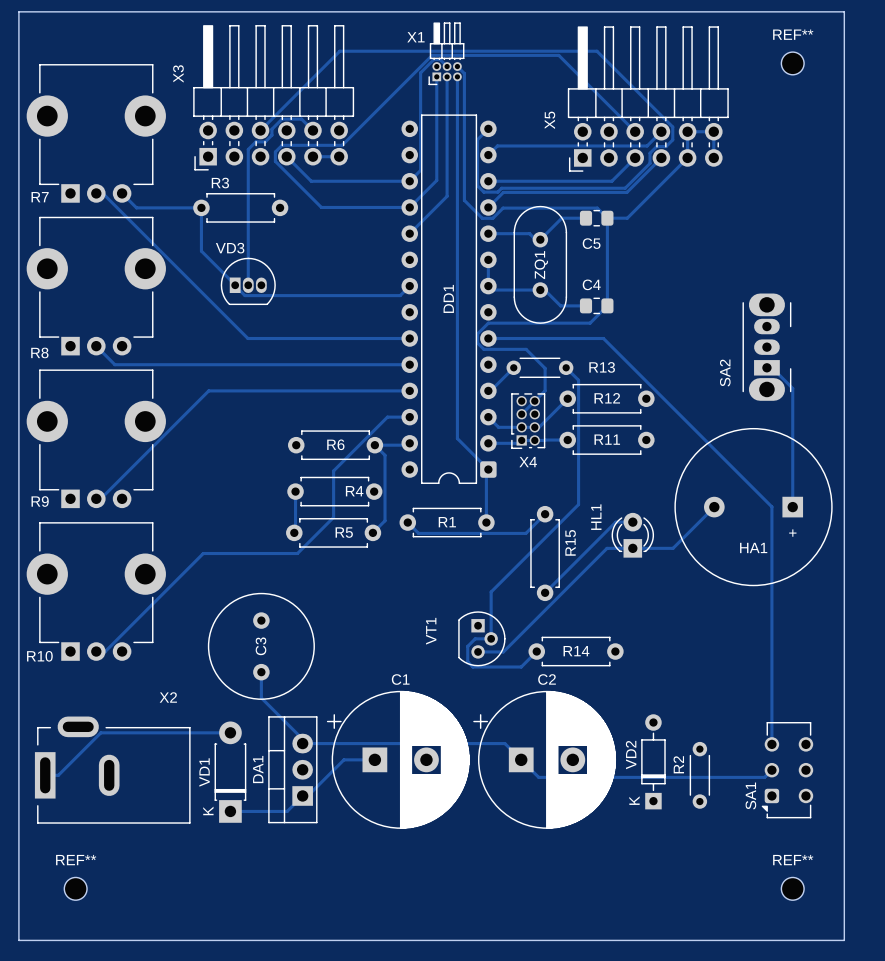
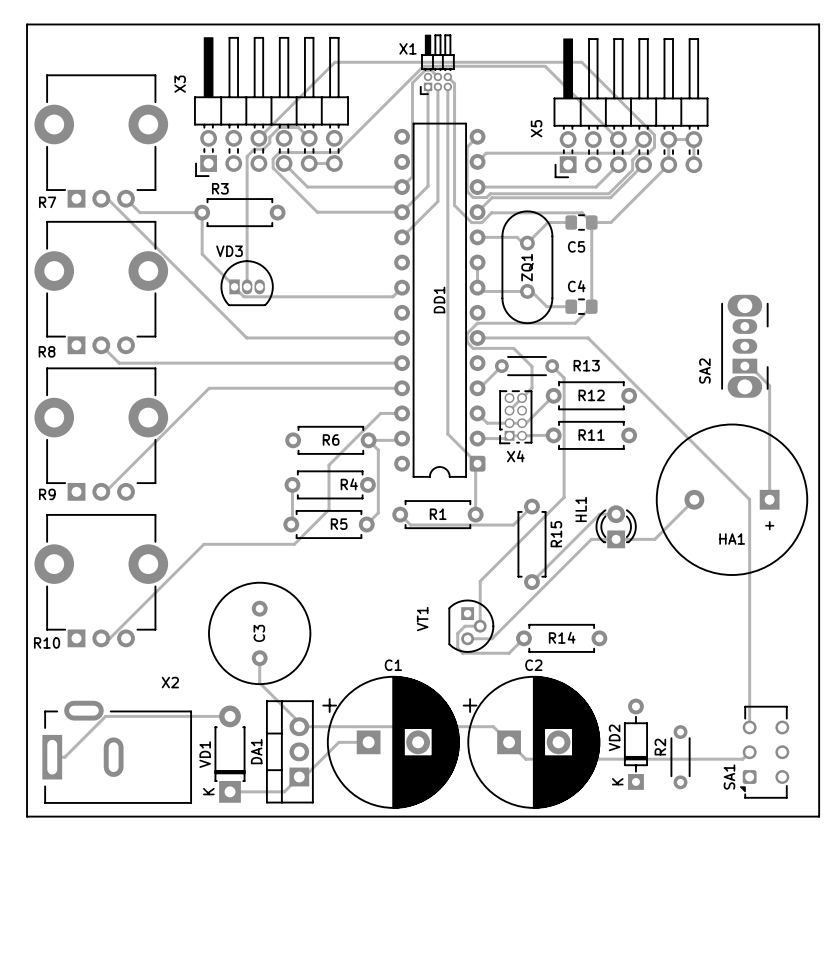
REF**: (792, 63) -> none
board edge: (18, 837) (18, 940) (844, 940) (844, 837) -> (27, 816) (819, 816)
REF**: (75, 888) -> none
REF**: (792, 888) -> none

